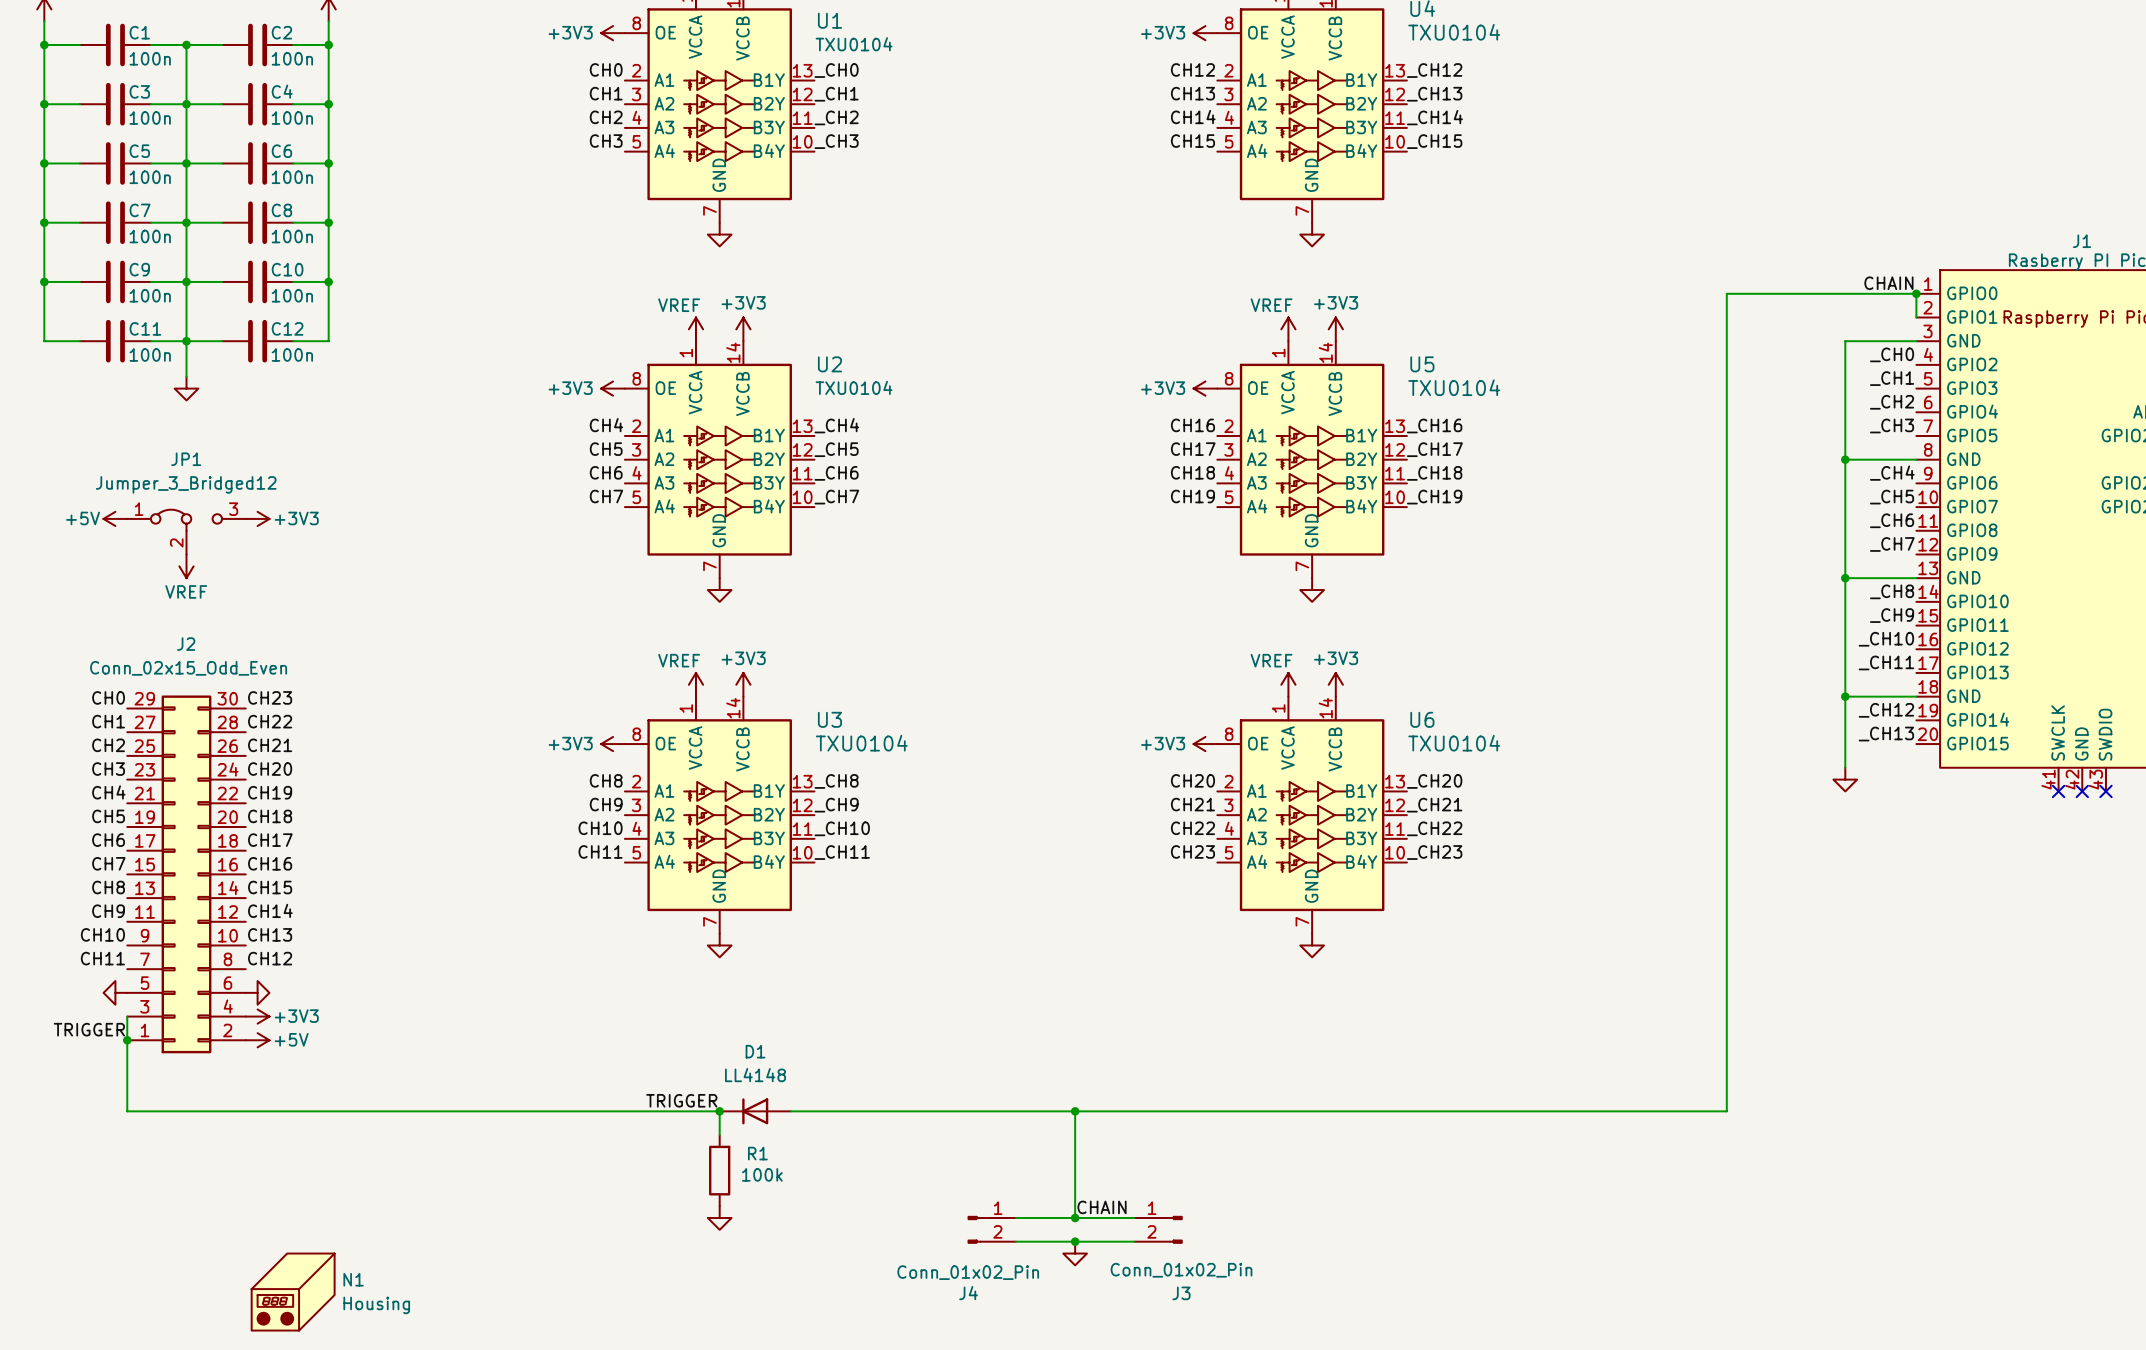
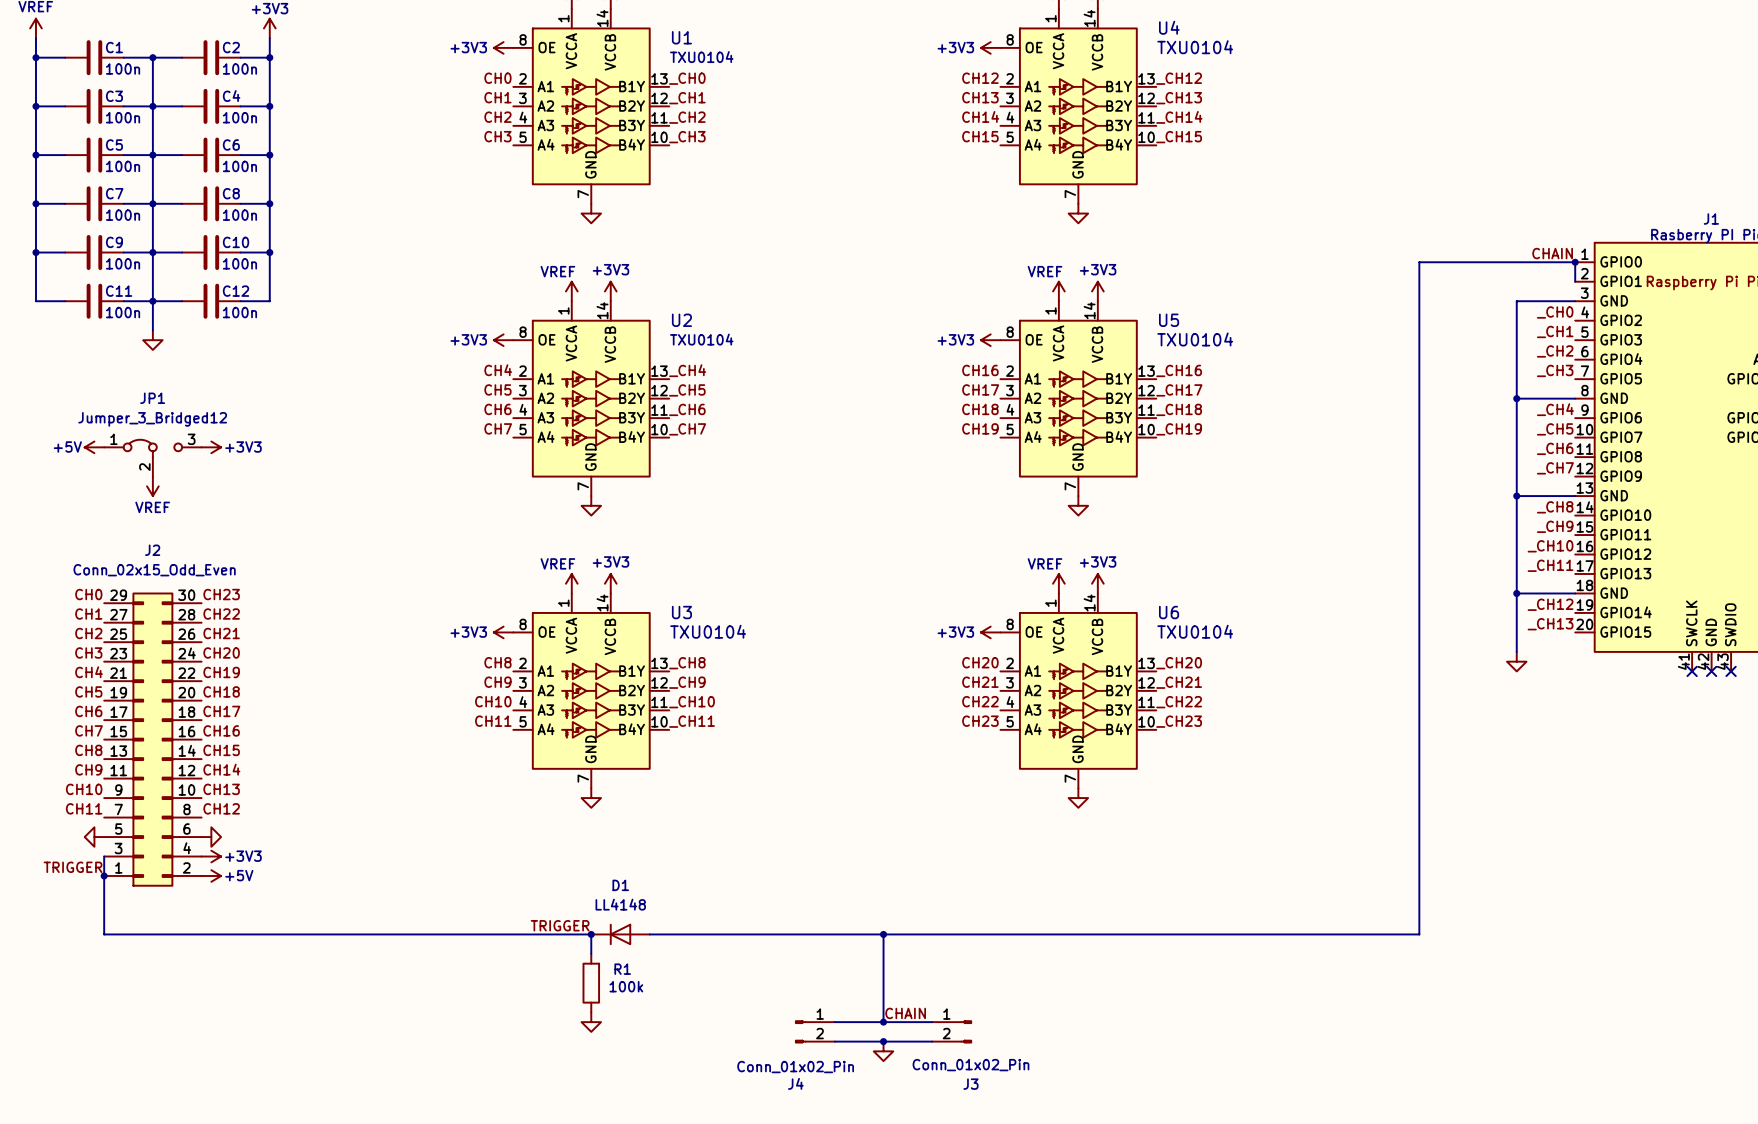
N1: Housing (293, 1292) -> none

